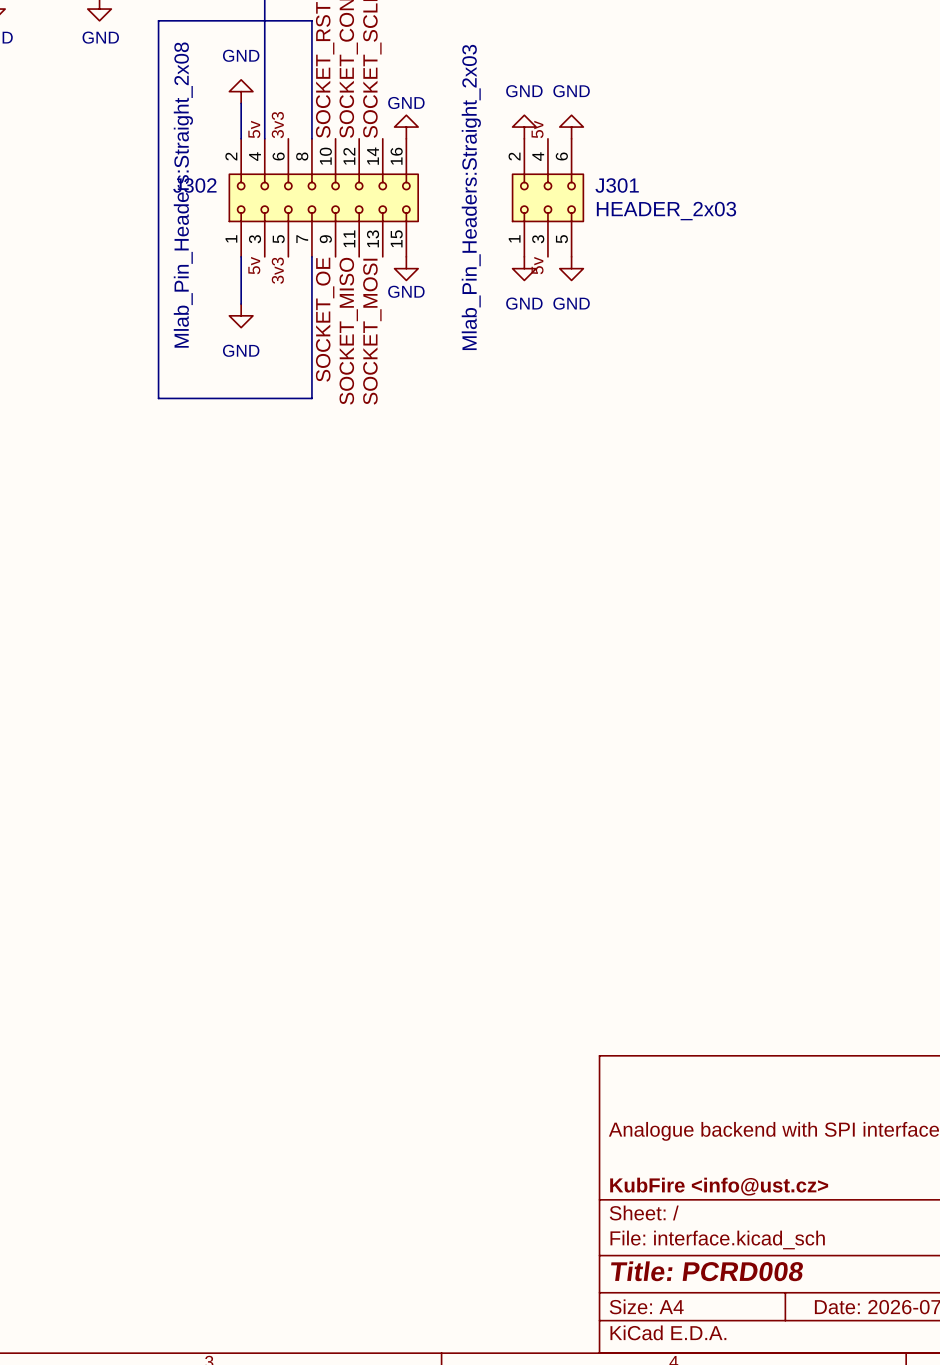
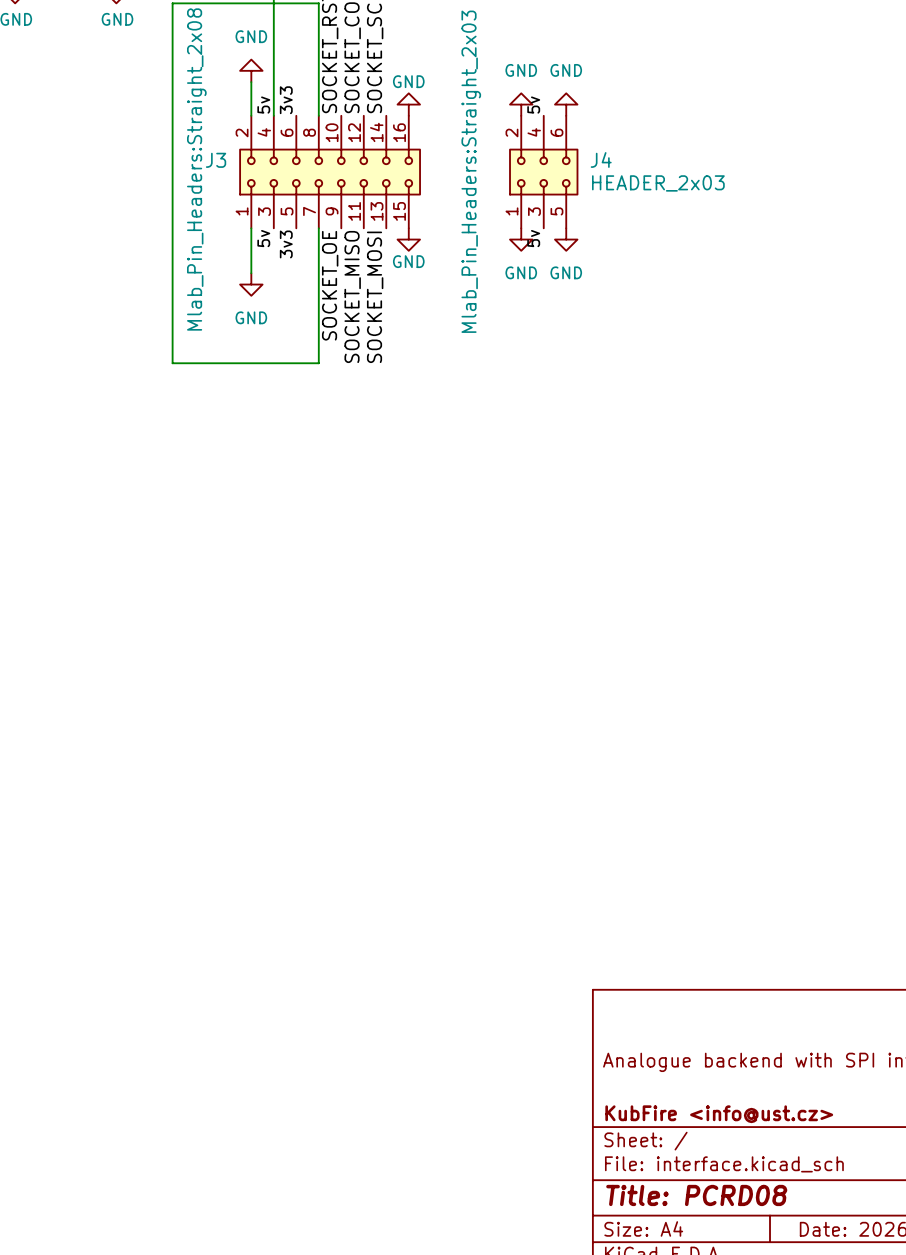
J302 name: J302 (194, 185) -> J3 (216, 160)
J301 name: J301 (617, 185) -> J4 (601, 159)
title block: Title: PCRD008 (707, 1271) -> Title: PCRD08 (696, 1195)

